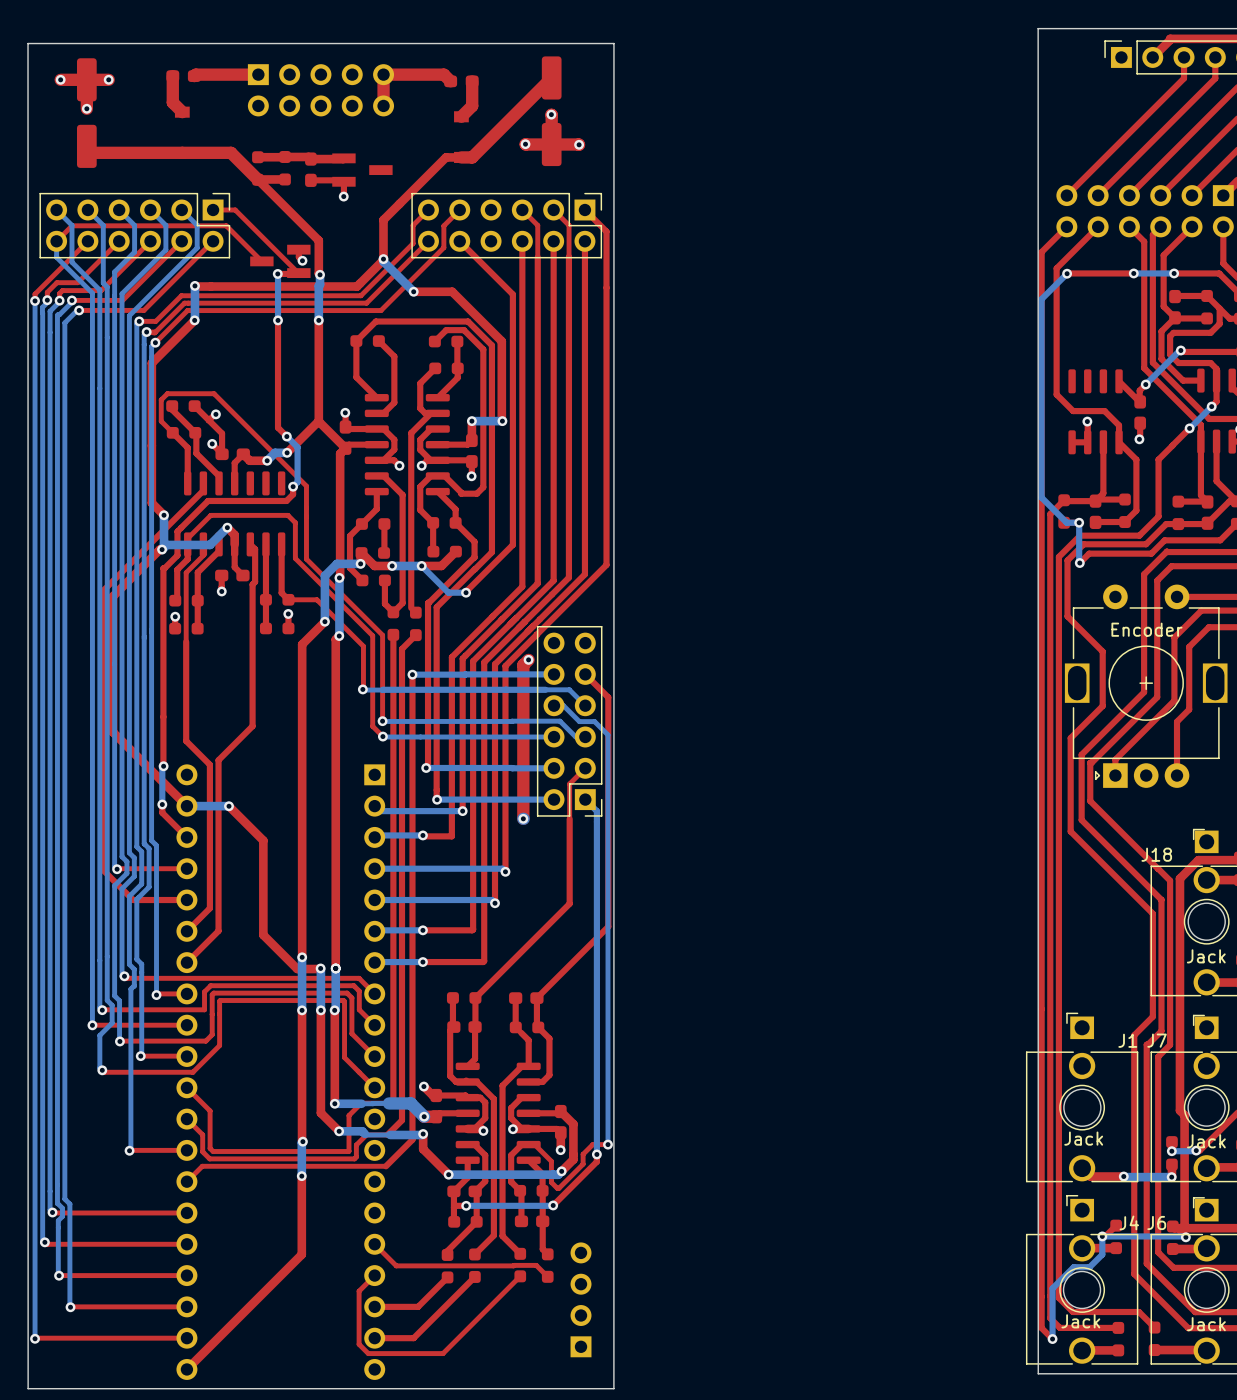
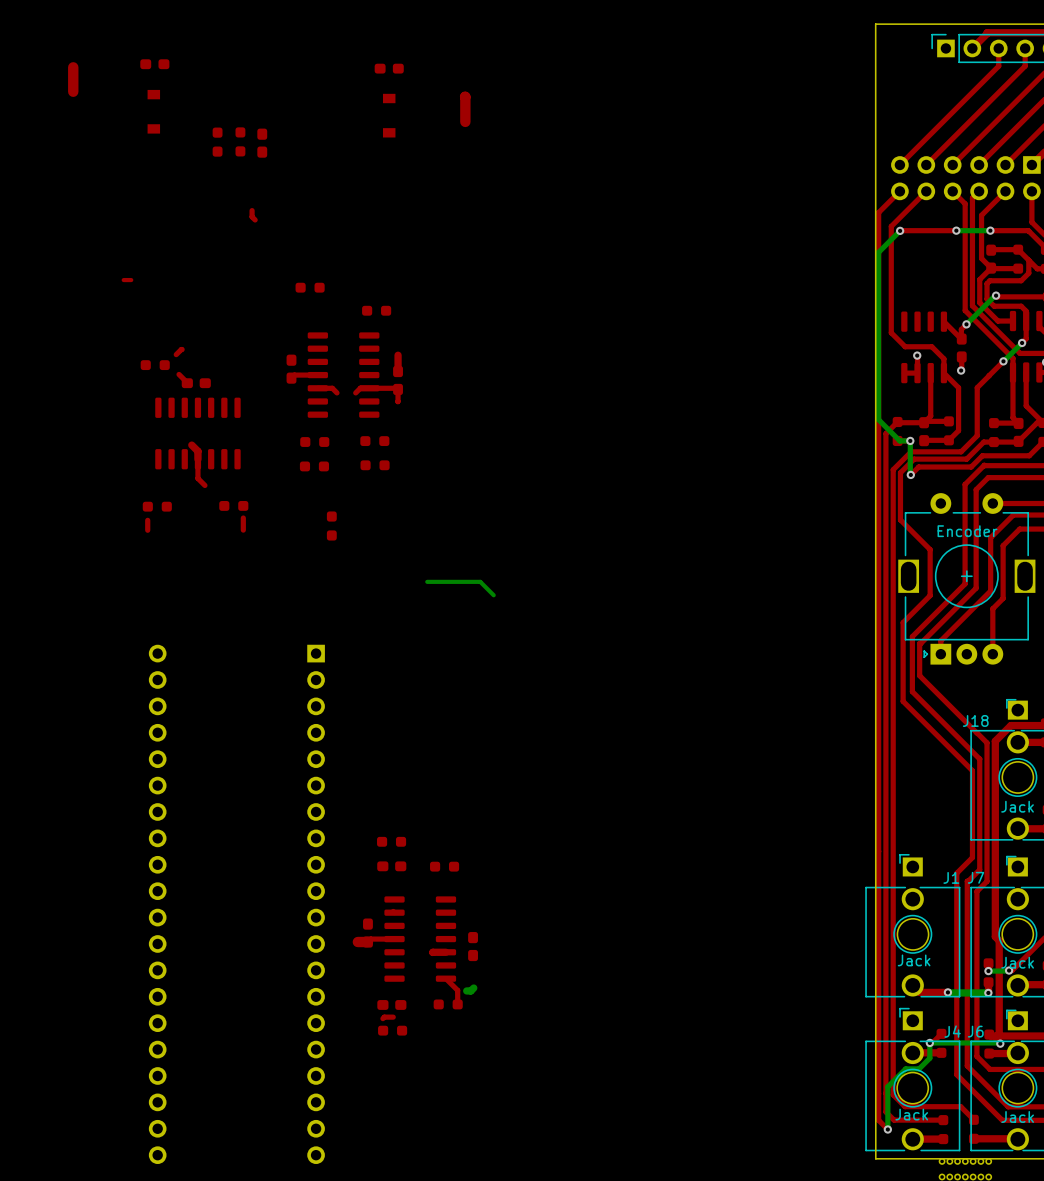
board edge: (613, 43) (613, 1388) (28, 1388) (28, 43) (613, 43) -> none
top track: (258, 74) (194, 76) -> none
top track: (172, 76) (172, 102) (182, 112) -> none
top track: (551, 77) (472, 157) (446, 157) (383, 219) (383, 260) (357, 286) (194, 285) -> none
via: (60, 79) -> none
top track: (108, 79) (60, 79) -> none
via: (108, 79) -> none
top track: (450, 81) (443, 74) (383, 74) (383, 105) -> none
top track: (472, 81) (472, 106) (461, 116) -> none
part: (320, 90) -> none
via: (86, 108) -> none
part: (551, 111) -> none
part: (86, 113) -> none
via: (551, 114) -> none
top track: (525, 144) (579, 144) -> none
via: (525, 144) -> none
via: (579, 144) -> none
top track: (86, 146) (93, 152) (231, 152) (257, 179) -> none
top track: (257, 157) (343, 158) -> none
part: (362, 170) -> none
top track: (257, 179) (318, 240) (320, 274) -> none
top track: (285, 179) (257, 179) -> none
top track: (310, 180) (342, 180) (343, 196) -> none
via: (343, 196) -> none
bottom track: (56, 210) (72, 225) (72, 262) (99, 290) (99, 1007) (102, 1010) -> none
bottom track: (87, 210) (103, 225) (103, 283) (107, 287) (107, 1000) (112, 1005) (112, 1023) (99, 1035) (99, 1067) (102, 1070) -> none
bottom track: (119, 210) (134, 225) (134, 252) (114, 271) (114, 866) (117, 869) -> none
bottom track: (150, 210) (165, 225) (165, 249) (122, 293) (122, 856) (126, 861) (126, 873) (114, 885) (114, 995) (119, 1000) (119, 1041) -> none
bottom track: (181, 210) (197, 225) (197, 247) (129, 315) (129, 852) (134, 857) (134, 876) (122, 888) (122, 976) (124, 976) -> none
top track: (213, 210) (235, 210) (298, 273) (277, 273) -> none
top track: (428, 210) (413, 225) (413, 243) (360, 295) (181, 295) (155, 321) (139, 321) -> none
top track: (459, 210) (443, 225) (443, 247) (381, 310) (187, 310) (155, 342) -> none
top track: (522, 210) (537, 225) (537, 257) -> none
top track: (553, 210) (569, 225) (569, 256) -> none
top track: (584, 210) (606, 231) (606, 564) (505, 666) (505, 871) -> none
part: (134, 225) -> none
part: (506, 225) -> none
top track: (56, 241) (72, 225) (226, 225) (261, 261) -> none
bottom track: (56, 241) (56, 257) (92, 293) (92, 1025) -> none
top track: (87, 241) (35, 294) (35, 300) -> none
top track: (119, 241) (77, 282) (56, 282) (47, 292) (47, 300) -> none
top track: (150, 241) (101, 290) (62, 290) (59, 293) (59, 300) -> none
top track: (181, 241) (122, 300) (71, 300) -> none
top track: (213, 241) (143, 310) (79, 310) -> none
top track: (428, 241) (366, 303) (184, 303) (153, 332) -> none
top track: (459, 241) (512, 294) (512, 544) (465, 592) -> none
top track: (522, 241) (522, 586) (451, 657) (451, 836) (422, 835) -> none
top track: (553, 241) (553, 580) (473, 661) (473, 929) (422, 930) -> none
top track: (584, 241) (584, 574) (495, 664) (495, 903) -> none
top track: (568, 256) (568, 577) (484, 662) (484, 961) (422, 962) -> none
top track: (537, 257) (537, 583) (462, 658) (462, 811) -> none
bottom track: (383, 259) (383, 261) (413, 291) -> none
via: (383, 259) -> none
via: (302, 260) -> none
part: (280, 261) -> none
bottom track: (277, 273) (278, 320) -> none
via: (277, 273) -> none
bottom track: (320, 274) (318, 320) -> none
via: (320, 274) -> none
bottom track: (194, 285) (194, 320) -> none
via: (194, 285) -> none
top track: (413, 291) (452, 291) (501, 341) (502, 421) -> none
via: (413, 291) -> none
bottom track: (35, 300) (35, 1338) -> none
via: (35, 300) -> none
bottom track: (47, 300) (42, 307) (42, 1242) (44, 1242) -> none
via: (47, 300) -> none
bottom track: (59, 300) (50, 311) (50, 1210) (52, 1212) -> none
via: (59, 300) -> none
bottom track: (71, 300) (57, 315) (57, 1203) (62, 1208) (62, 1216) (58, 1220) (59, 1275) -> none
via: (71, 300) -> none
bottom track: (79, 310) (64, 322) (64, 1199) (69, 1204) (70, 1307) -> none
via: (79, 310) -> none
top track: (194, 320) (151, 363) (151, 503) (164, 515) -> none
via: (194, 320) -> none
top track: (278, 320) (278, 427) (286, 436) -> none
via: (278, 320) -> none
top track: (318, 320) (318, 421) -> none
via: (318, 320) -> none
bottom track: (139, 321) (136, 323) (136, 846) (141, 851) (141, 884) (129, 896) (129, 964) (134, 969) (134, 986) -> none
via: (139, 321) -> none
bottom track: (146, 332) (144, 334) (144, 843) (149, 848) (149, 887) (136, 899) (136, 959) (141, 964) (140, 1056) -> none
via: (146, 332) -> none
top track: (378, 341) (394, 356) (394, 402) (383, 413) (376, 413) -> none
top track: (434, 341) (446, 330) (463, 330) (483, 349) (483, 487) (476, 493) (461, 493) (444, 475) (430, 475) (420, 486) (420, 510) (433, 522) (433, 551) -> none
part: (446, 341) -> none
top track: (457, 341) (457, 377) (437, 397) -> none
bottom track: (155, 342) (151, 346) (151, 840) (156, 845) (156, 995) -> none
via: (155, 342) -> none
top track: (435, 368) (420, 383) (420, 408) (425, 413) (437, 413) -> none
top track: (376, 397) (356, 377) (356, 341) (375, 321) (468, 321) (491, 345) (491, 552) (436, 607) (437, 799) -> none
top track: (172, 406) (172, 409) (196, 433) (196, 453) (219, 476) (219, 483) -> none
part: (183, 406) -> none
top track: (194, 406) (222, 433) (222, 454) -> none
top track: (345, 412) (345, 427) (347, 429) (383, 429) (394, 439) (394, 449) (383, 460) -> none
via: (345, 412) -> none
top track: (430, 413) (411, 433) (411, 608) -> none
via: (215, 414) -> none
top track: (318, 421) (345, 448) (340, 453) (339, 577) -> none
top track: (318, 421) (287, 452) -> none
via: (471, 421) -> none
bottom track: (502, 421) (471, 421) -> none
via: (502, 421) -> none
top track: (437, 429) (430, 429) (420, 439) (420, 449) (430, 460) -> none
bottom track: (286, 436) (297, 447) (297, 482) (293, 486) -> none
via: (286, 436) -> none
top track: (471, 440) (467, 444) (437, 444) -> none
via: (212, 443) -> none
bottom track: (287, 452) (275, 452) (267, 460) -> none
via: (287, 452) -> none
top track: (267, 460) (249, 460) (243, 454) (234, 462) (234, 483) -> none
via: (267, 460) -> none
via: (399, 465) -> none
via: (421, 465) -> none
top track: (376, 475) (383, 475) (402, 494) (402, 603) (393, 612) (384, 603) (384, 580) -> none
via: (471, 476) -> none
top track: (187, 483) (187, 447) (161, 421) (161, 399) (167, 393) (214, 393) (306, 486) (306, 559) (382, 635) (382, 721) -> none
top track: (203, 483) (203, 490) (103, 590) (103, 870) (133, 900) (186, 900) -> none
top track: (293, 486) (293, 494) (286, 500) (208, 500) (177, 531) (177, 555) (163, 568) (163, 766) -> none
via: (293, 486) -> none
top track: (376, 491) (376, 509) (350, 535) (350, 568) (362, 580) -> none
top track: (437, 491) (455, 509) (455, 522) (474, 541) (474, 557) (428, 603) (428, 766) (426, 767) -> none
bottom track: (164, 515) (164, 544) -> none
via: (164, 515) -> none
top track: (384, 524) (384, 552) -> none
bottom track: (227, 527) (210, 544) (164, 544) -> none
via: (227, 527) -> none
top track: (203, 544) (203, 555) (186, 572) (186, 741) (209, 764) (209, 908) (186, 931) (202, 915) -> none
top track: (219, 544) (219, 551) (197, 572) (197, 628) -> none
top track: (250, 544) (255, 549) (255, 581) (252, 584) (252, 726) (218, 760) (218, 931) (186, 962) -> none
top track: (265, 544) (265, 628) -> none
top track: (281, 544) (281, 592) (288, 599) -> none
top track: (162, 549) (159, 549) (113, 596) (113, 732) (186, 806) -> none
via: (162, 549) -> none
top track: (455, 551) (441, 565) (421, 565) -> none
top track: (360, 563) (361, 552) (374, 565) (392, 565) -> none
bottom track: (360, 563) (336, 563) (324, 575) (324, 621) -> none
via: (360, 563) -> none
bottom track: (392, 565) (421, 565) (448, 592) (466, 592) -> none
via: (392, 565) -> none
via: (421, 565) -> none
part: (232, 575) -> none
bottom track: (339, 577) (339, 636) -> none
via: (339, 577) -> none
part: (373, 580) -> none
via: (221, 591) -> none
via: (466, 592) -> none
top track: (288, 599) (316, 599) (363, 646) (362, 689) -> none
top track: (175, 600) (177, 598) (177, 569) (187, 559) (187, 538) (210, 515) (288, 515) (295, 522) (295, 558) (372, 635) (372, 726) (382, 736) -> none
via: (288, 613) -> none
via: (175, 616) -> none
top track: (324, 621) (302, 644) (302, 957) -> none
via: (324, 621) -> none
part: (415, 623) -> none
part: (186, 628) -> none
part: (277, 628) -> none
top track: (393, 634) (393, 1099) (389, 1103) -> none
top track: (415, 635) (402, 648) (402, 1120) (387, 1134) (366, 1134) (356, 1145) (356, 1157) (354, 1158) (209, 1158) (202, 1151) (202, 1134) (186, 1119) -> none
top track: (339, 636) (335, 639) (335, 968) -> none
via: (339, 636) -> none
top track: (528, 659) (523, 665) (523, 818) -> none
via: (528, 659) -> none
top track: (412, 674) (412, 1139) (385, 1166) (202, 1166) (184, 1183) -> none
via: (412, 674) -> none
bottom track: (554, 674) (412, 674) -> none
top track: (585, 674) (608, 697) (608, 926) (536, 998) (536, 1026) (549, 1038) (549, 1075) (542, 1081) (528, 1081) (534, 1081) -> none
bottom track: (362, 689) (545, 689) -> none
via: (362, 689) -> none
bottom track: (554, 705) (563, 705) (579, 721) (594, 721) (607, 734) (607, 1144) -> none
bottom track: (382, 721) (559, 721) (575, 737) (585, 737) -> none
via: (382, 721) -> none
part: (569, 721) -> none
bottom track: (382, 736) (553, 737) -> none
via: (382, 736) -> none
bottom track: (163, 766) (162, 804) -> none
via: (163, 766) -> none
bottom track: (426, 767) (554, 768) -> none
via: (426, 767) -> none
top track: (585, 768) (569, 783) (569, 903) (475, 997) (475, 1058) (467, 1066) -> none
via: (437, 799) -> none
bottom track: (554, 799) (437, 799) -> none
bottom track: (585, 799) (596, 811) (596, 1154) -> none
top track: (162, 804) (162, 812) (186, 837) -> none
via: (162, 804) -> none
bottom track: (228, 806) (186, 806) -> none
top track: (229, 806) (263, 840) (263, 935) (297, 969) (320, 968) -> none
via: (229, 806) -> none
bottom track: (374, 806) (379, 811) (462, 811) -> none
via: (462, 811) -> none
bottom track: (523, 818) (523, 818) -> none
via: (523, 818) -> none
bottom track: (422, 835) (376, 835) (374, 837) -> none
via: (422, 835) -> none
top track: (186, 868) (117, 869) -> none
bottom track: (374, 868) (502, 868) (505, 871) -> none
via: (117, 869) -> none
via: (505, 871) -> none
bottom track: (374, 900) (491, 900) (495, 903) -> none
via: (495, 903) -> none
bottom track: (422, 930) (374, 931) -> none
via: (422, 930) -> none
bottom track: (302, 957) (302, 1010) -> none
via: (302, 957) -> none
bottom track: (422, 962) (374, 962) -> none
via: (422, 962) -> none
bottom track: (320, 968) (320, 1010) -> none
via: (320, 968) -> none
bottom track: (335, 968) (334, 1010) -> none
via: (335, 968) -> none
top track: (124, 976) (126, 978) (359, 978) (374, 993) -> none
via: (124, 976) -> none
bottom track: (134, 985) (130, 989) (129, 1150) -> none
top track: (186, 993) (156, 995) -> none
via: (156, 995) -> none
top track: (452, 997) (453, 1027) (450, 1030) (450, 1075) (456, 1081) (476, 1081) (493, 1098) (493, 1235) (474, 1254) -> none
top track: (515, 998) (515, 1027) -> none
part: (526, 998) -> none
top track: (102, 1010) (204, 1009) (204, 991) (210, 985) (353, 985) (359, 991) (359, 1009) (374, 1025) -> none
via: (102, 1010) -> none
top track: (302, 1010) (302, 1141) -> none
via: (302, 1010) -> none
top track: (320, 1010) (320, 1113) (339, 1131) -> none
via: (320, 1010) -> none
top track: (334, 1010) (334, 1103) -> none
via: (334, 1010) -> none
via: (92, 1025) -> none
top track: (186, 1025) (92, 1025) -> none
top track: (515, 1027) (528, 1040) (528, 1066) (521, 1066) (502, 1085) (502, 1236) (520, 1253) -> none
top track: (119, 1041) (205, 1041) (212, 1034) (212, 994) (213, 993) (347, 993) (351, 997) (351, 1033) (374, 1056) -> none
via: (119, 1041) -> none
via: (140, 1056) -> none
top track: (186, 1056) (141, 1056) -> none
top track: (102, 1070) (104, 1072) (192, 1072) (219, 1045) (220, 1000) (343, 1000) (344, 1057) (374, 1087) -> none
via: (102, 1070) -> none
top track: (423, 1086) (432, 1095) (480, 1097) (485, 1102) (485, 1118) (474, 1128) (467, 1128) (481, 1128) (483, 1130) -> none
via: (423, 1086) -> none
top track: (186, 1087) (210, 1110) (210, 1148) (213, 1151) (348, 1151) (348, 1115) (361, 1103) (389, 1103) -> none
top track: (528, 1097) (521, 1097) (511, 1108) (511, 1118) (521, 1128) (556, 1128) (560, 1132) (560, 1150) -> none
bottom track: (334, 1103) (410, 1103) (424, 1116) -> none
via: (334, 1103) -> none
top track: (528, 1113) (559, 1113) (560, 1111) (573, 1124) (573, 1159) (561, 1171) -> none
via: (424, 1116) -> none
via: (512, 1129) -> none
via: (483, 1130) -> none
bottom track: (339, 1131) (362, 1131) (366, 1134) (390, 1134) -> none
via: (339, 1131) -> none
top track: (423, 1134) (423, 1149) (448, 1174) -> none
bottom track: (423, 1134) (390, 1134) -> none
via: (423, 1134) -> none
bottom track: (302, 1141) (301, 1176) -> none
via: (302, 1141) -> none
top track: (467, 1144) (474, 1144) (485, 1155) (485, 1181) (475, 1191) (476, 1221) (447, 1250) (447, 1254) -> none
top track: (607, 1144) (592, 1144) (583, 1154) (583, 1164) (557, 1188) (551, 1182) (551, 1161) (534, 1144) (521, 1144) (511, 1155) (511, 1181) (521, 1192) (521, 1221) -> none
via: (607, 1144) -> none
via: (129, 1150) -> none
top track: (186, 1150) (129, 1150) -> none
via: (560, 1150) -> none
top track: (596, 1154) (596, 1161) (553, 1205) -> none
via: (596, 1154) -> none
top track: (467, 1160) (467, 1177) (453, 1191) (454, 1221) -> none
via: (561, 1171) -> none
via: (448, 1174) -> none
bottom track: (553, 1174) (448, 1174) -> none
top track: (301, 1176) (301, 1254) (186, 1369) -> none
via: (301, 1176) -> none
top track: (542, 1190) (542, 1249) (547, 1254) -> none
via: (466, 1205) -> none
bottom track: (553, 1205) (466, 1205) -> none
via: (553, 1205) -> none
via: (52, 1212) -> none
top track: (186, 1212) (53, 1212) -> none
part: (532, 1221) -> none
via: (44, 1242) -> none
top track: (186, 1244) (46, 1244) -> none
top track: (374, 1244) (396, 1265) (536, 1265) (547, 1276) -> none
part: (474, 1265) -> none
part: (520, 1265) -> none
part: (547, 1265) -> none
part: (447, 1266) -> none
via: (59, 1275) -> none
top track: (186, 1275) (59, 1275) -> none
top track: (374, 1275) (359, 1291) (359, 1344) (368, 1353) (443, 1353) (520, 1276) -> none
top track: (474, 1276) (413, 1338) (374, 1338) -> none
top track: (447, 1277) (418, 1306) (374, 1306) -> none
part: (581, 1299) -> none
top track: (186, 1306) (70, 1307) -> none
via: (70, 1307) -> none
via: (35, 1338) -> none
top track: (186, 1338) (35, 1338) -> none
part: none -> (965, 1169)

